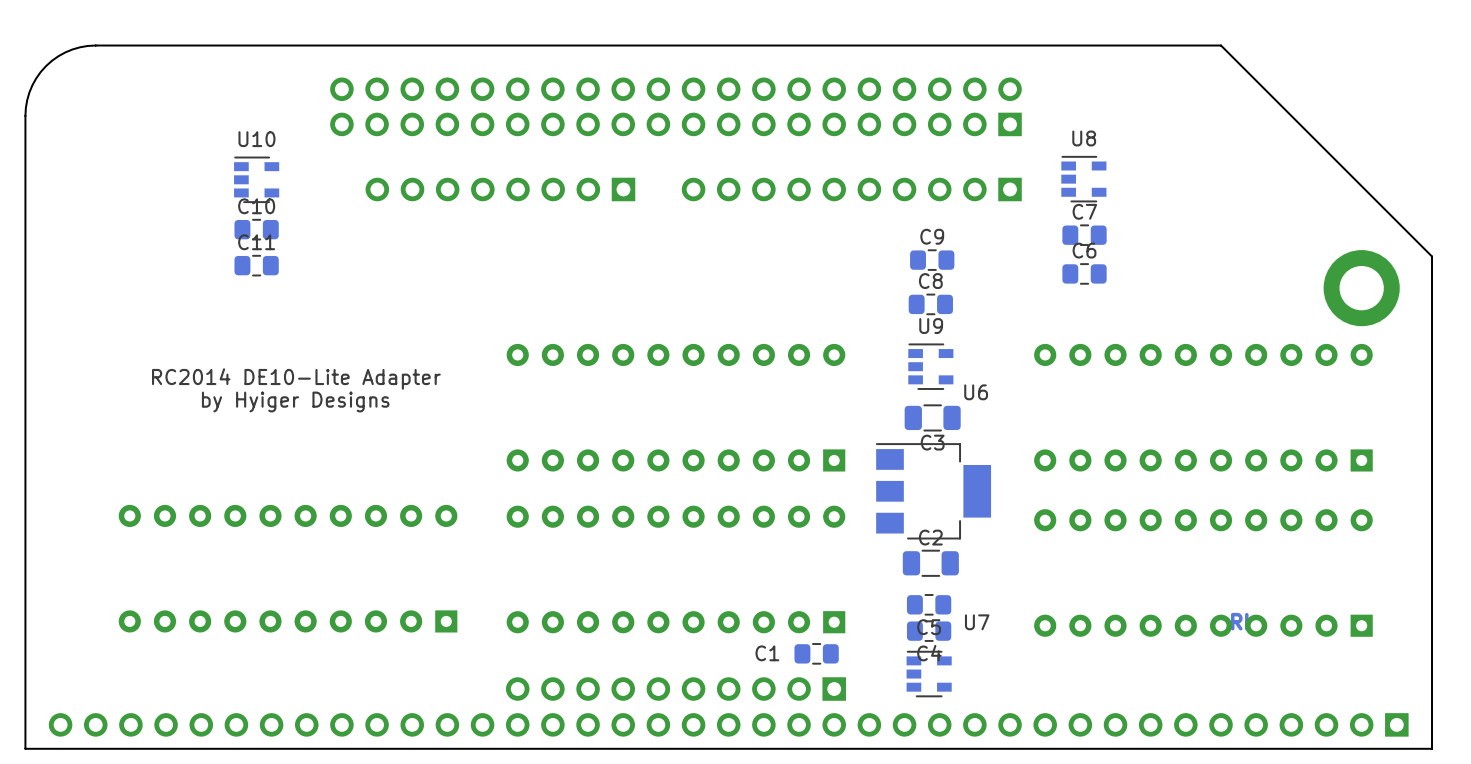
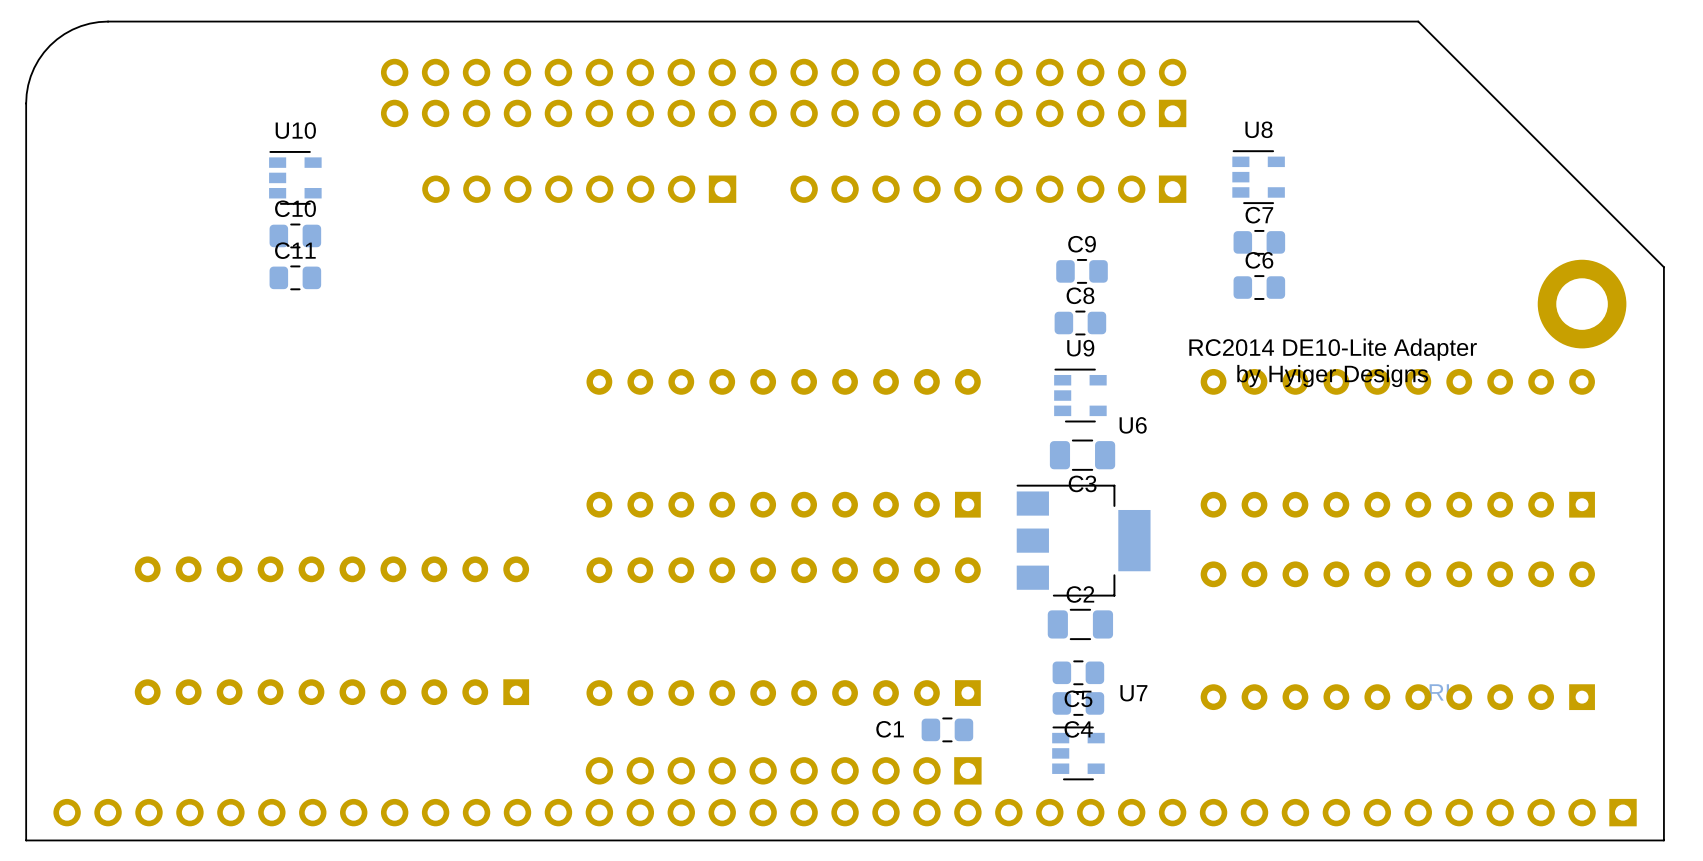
text: none -> RC2014 DE10-Lite Adapter (1333, 349)
text: none -> by Hyiger Designs (1332, 376)
text: RC2014 DE10-Lite Adapter (296, 379) -> none
text: by Hyiger Designs (295, 401) -> none

